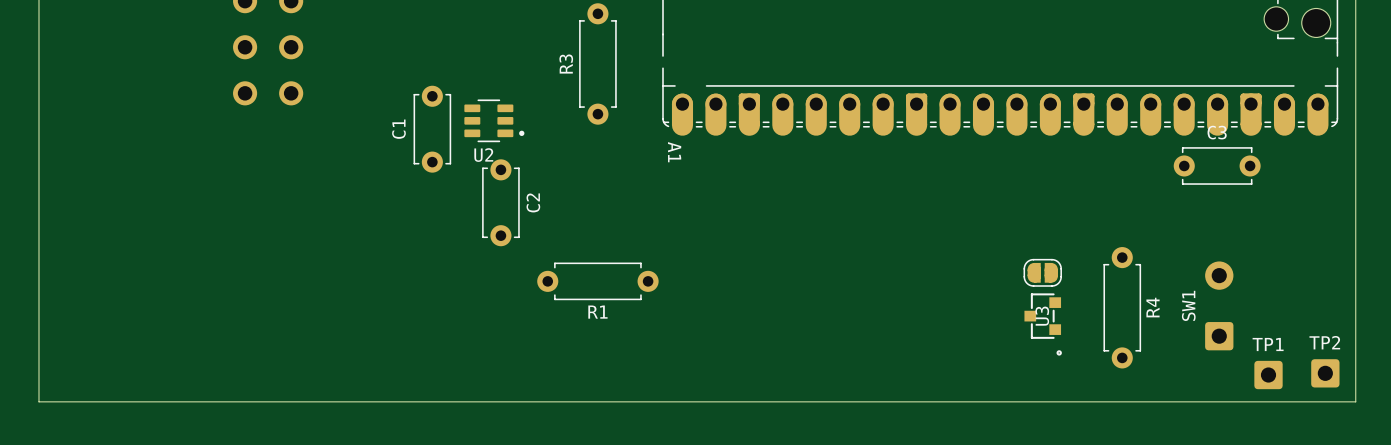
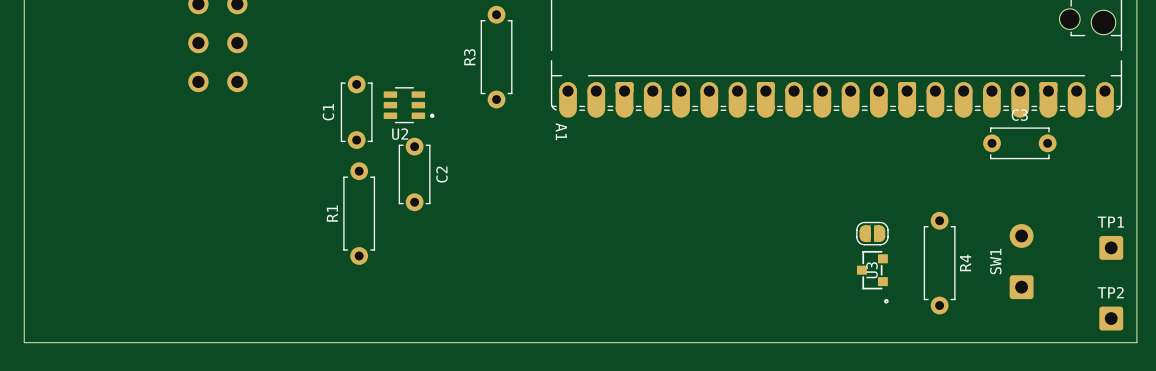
R1 rotation: 0° (597, 281) -> 90° clockwise (359, 213)
R1 position: (597, 281) -> (359, 213)
TP1 position: (1268, 375) -> (1111, 247)

